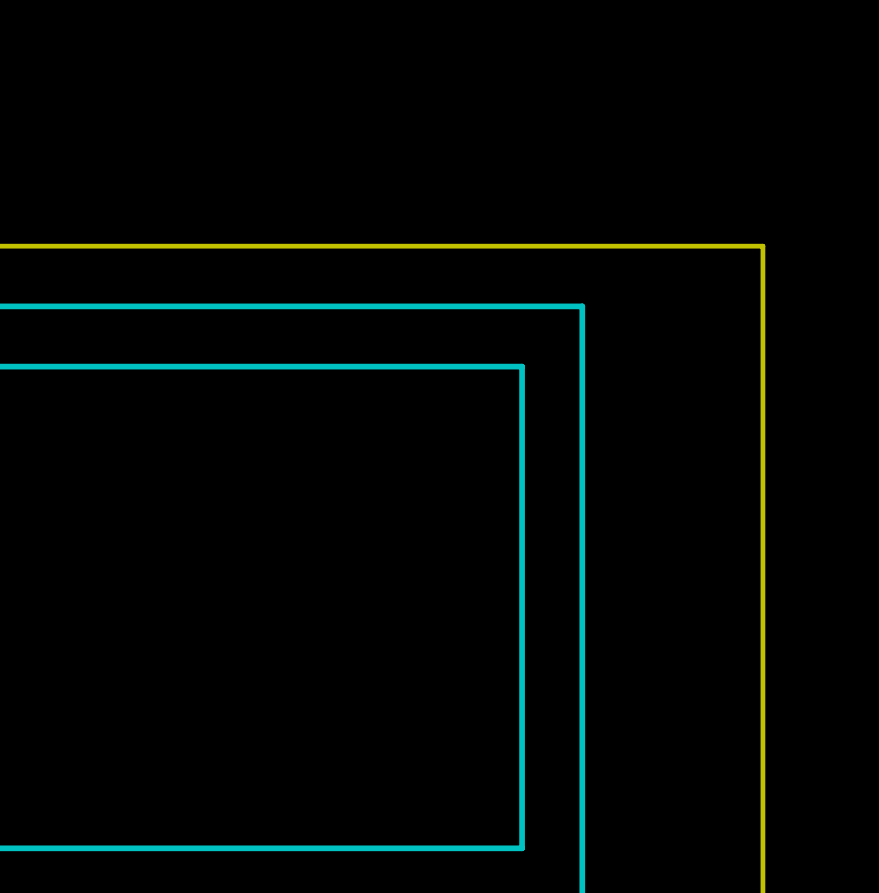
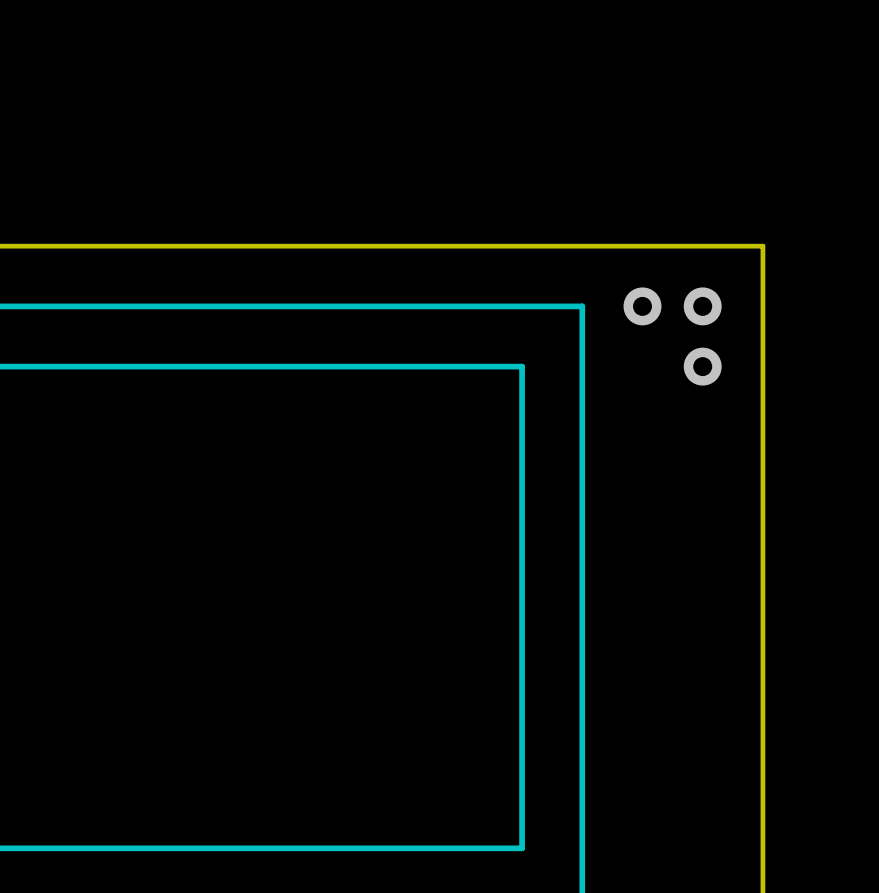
via: none -> (642, 306)
via: none -> (702, 306)
via: none -> (702, 366)

